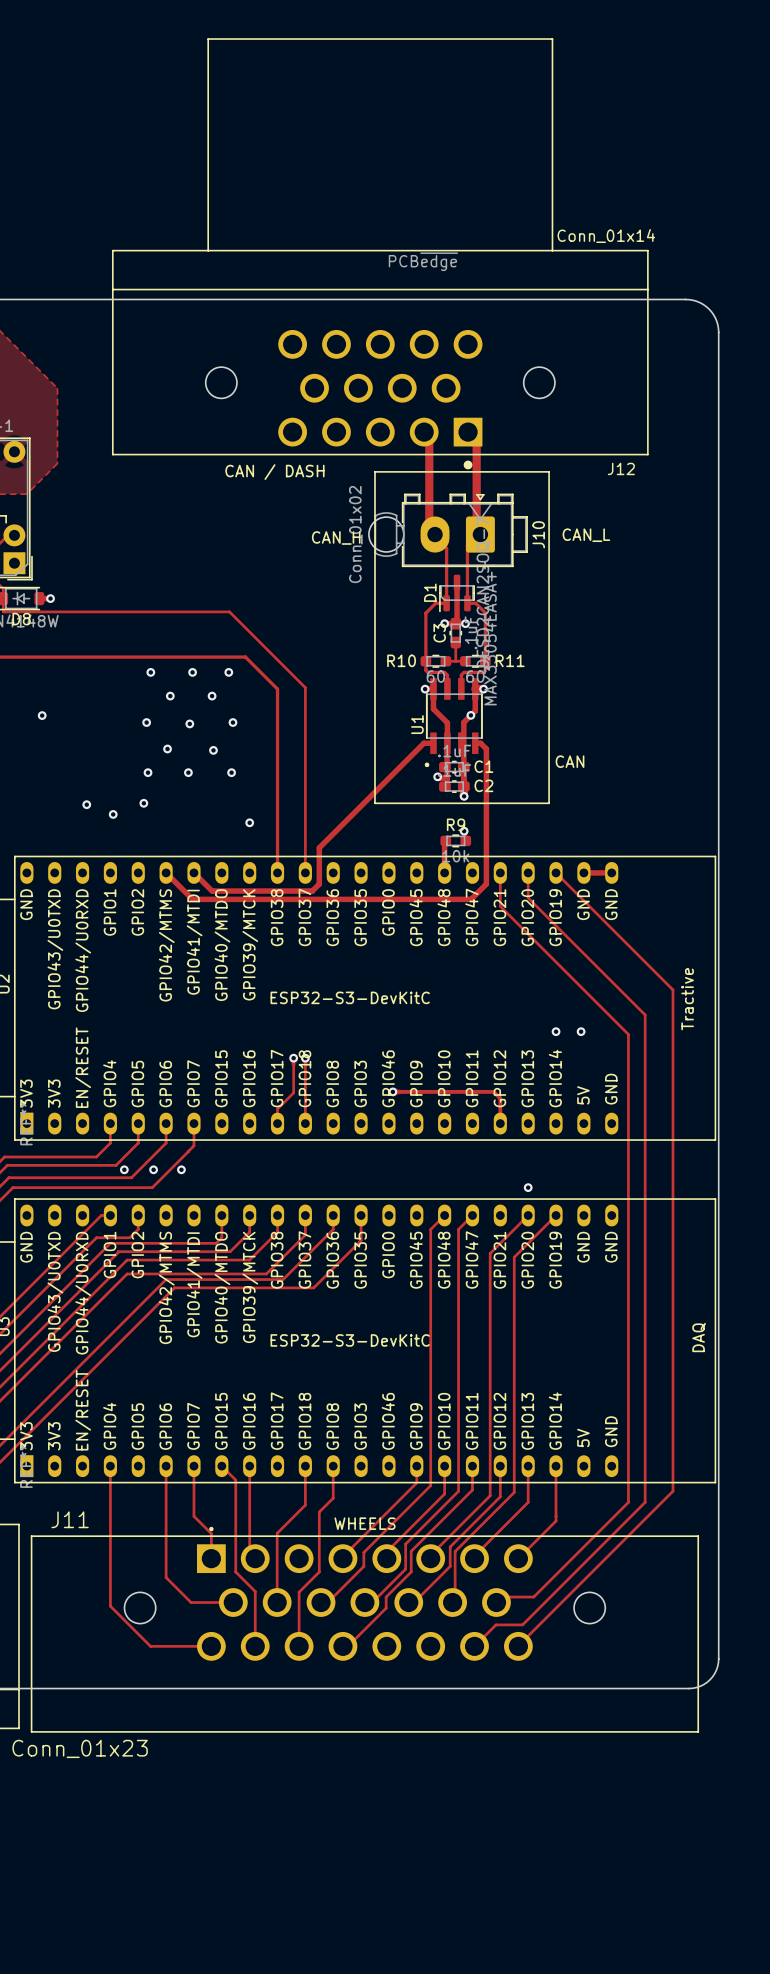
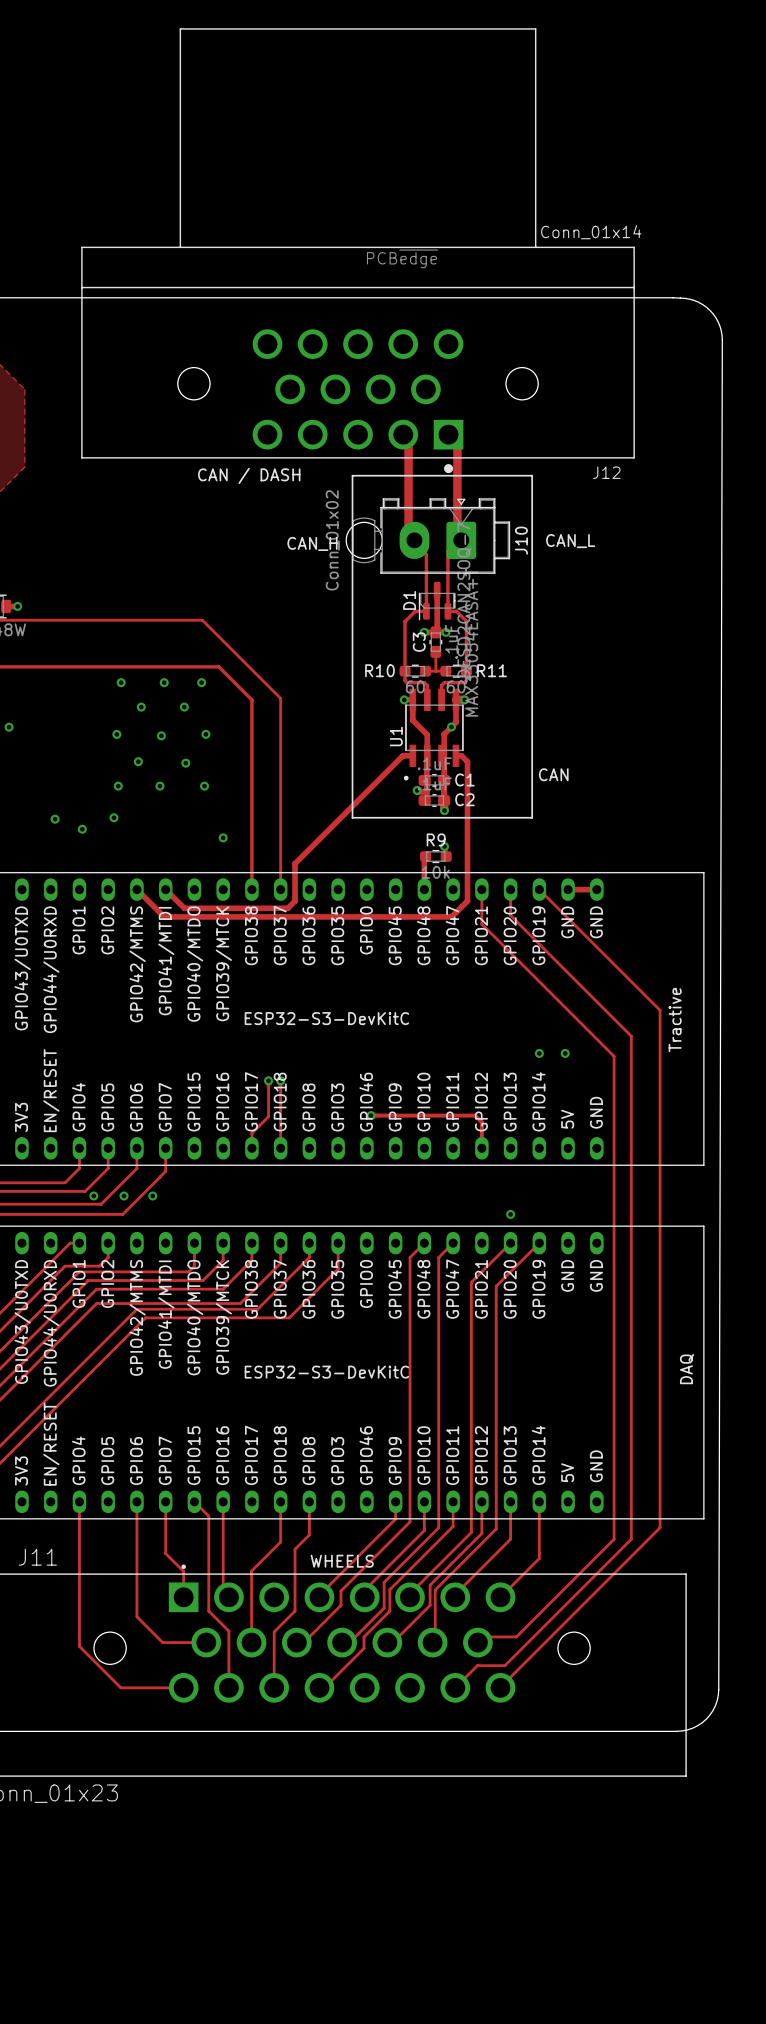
board edge: (685, 299) (696, 301) (708, 309) (716, 321) (718, 332) (718, 1659) -> (673, 297) (689, 299) (706, 307) (718, 322) (722, 340) (718, 1689) (715, 1705) (706, 1719) (692, 1728) (676, 1731)
board edge: (718, 1658) (716, 1670) (709, 1679) (700, 1686) (688, 1688) -> none

